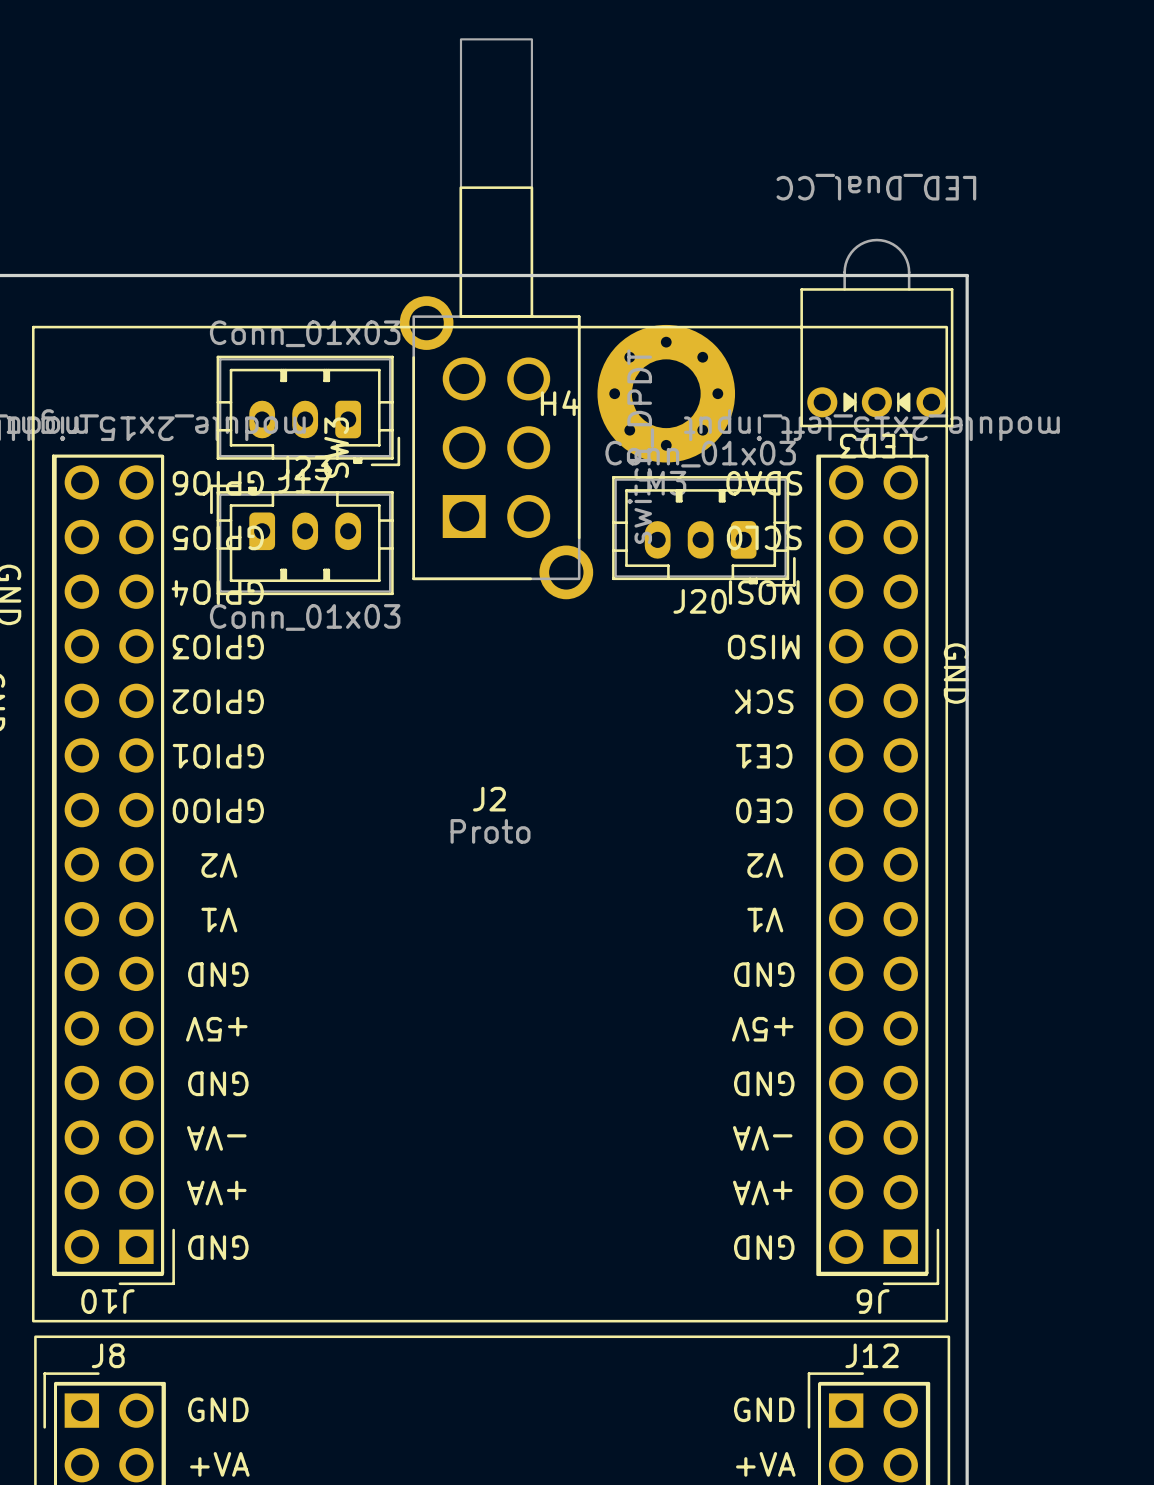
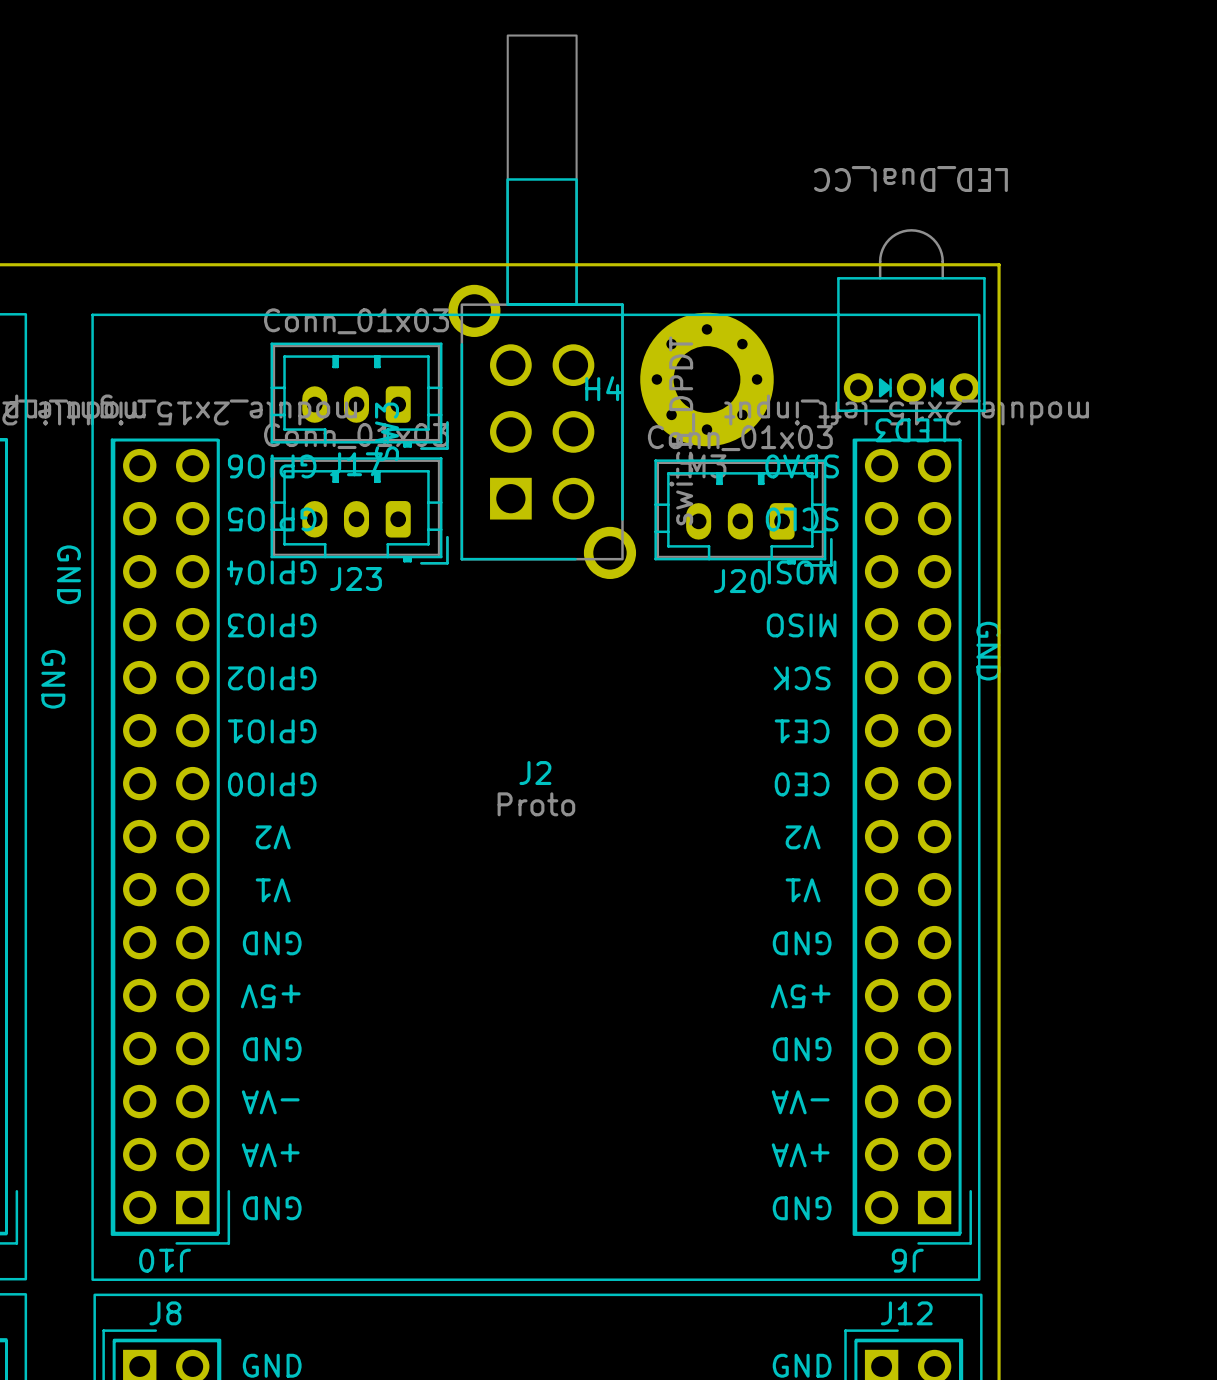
J23 rotation: 0° (301, 539) -> 180° (359, 510)

